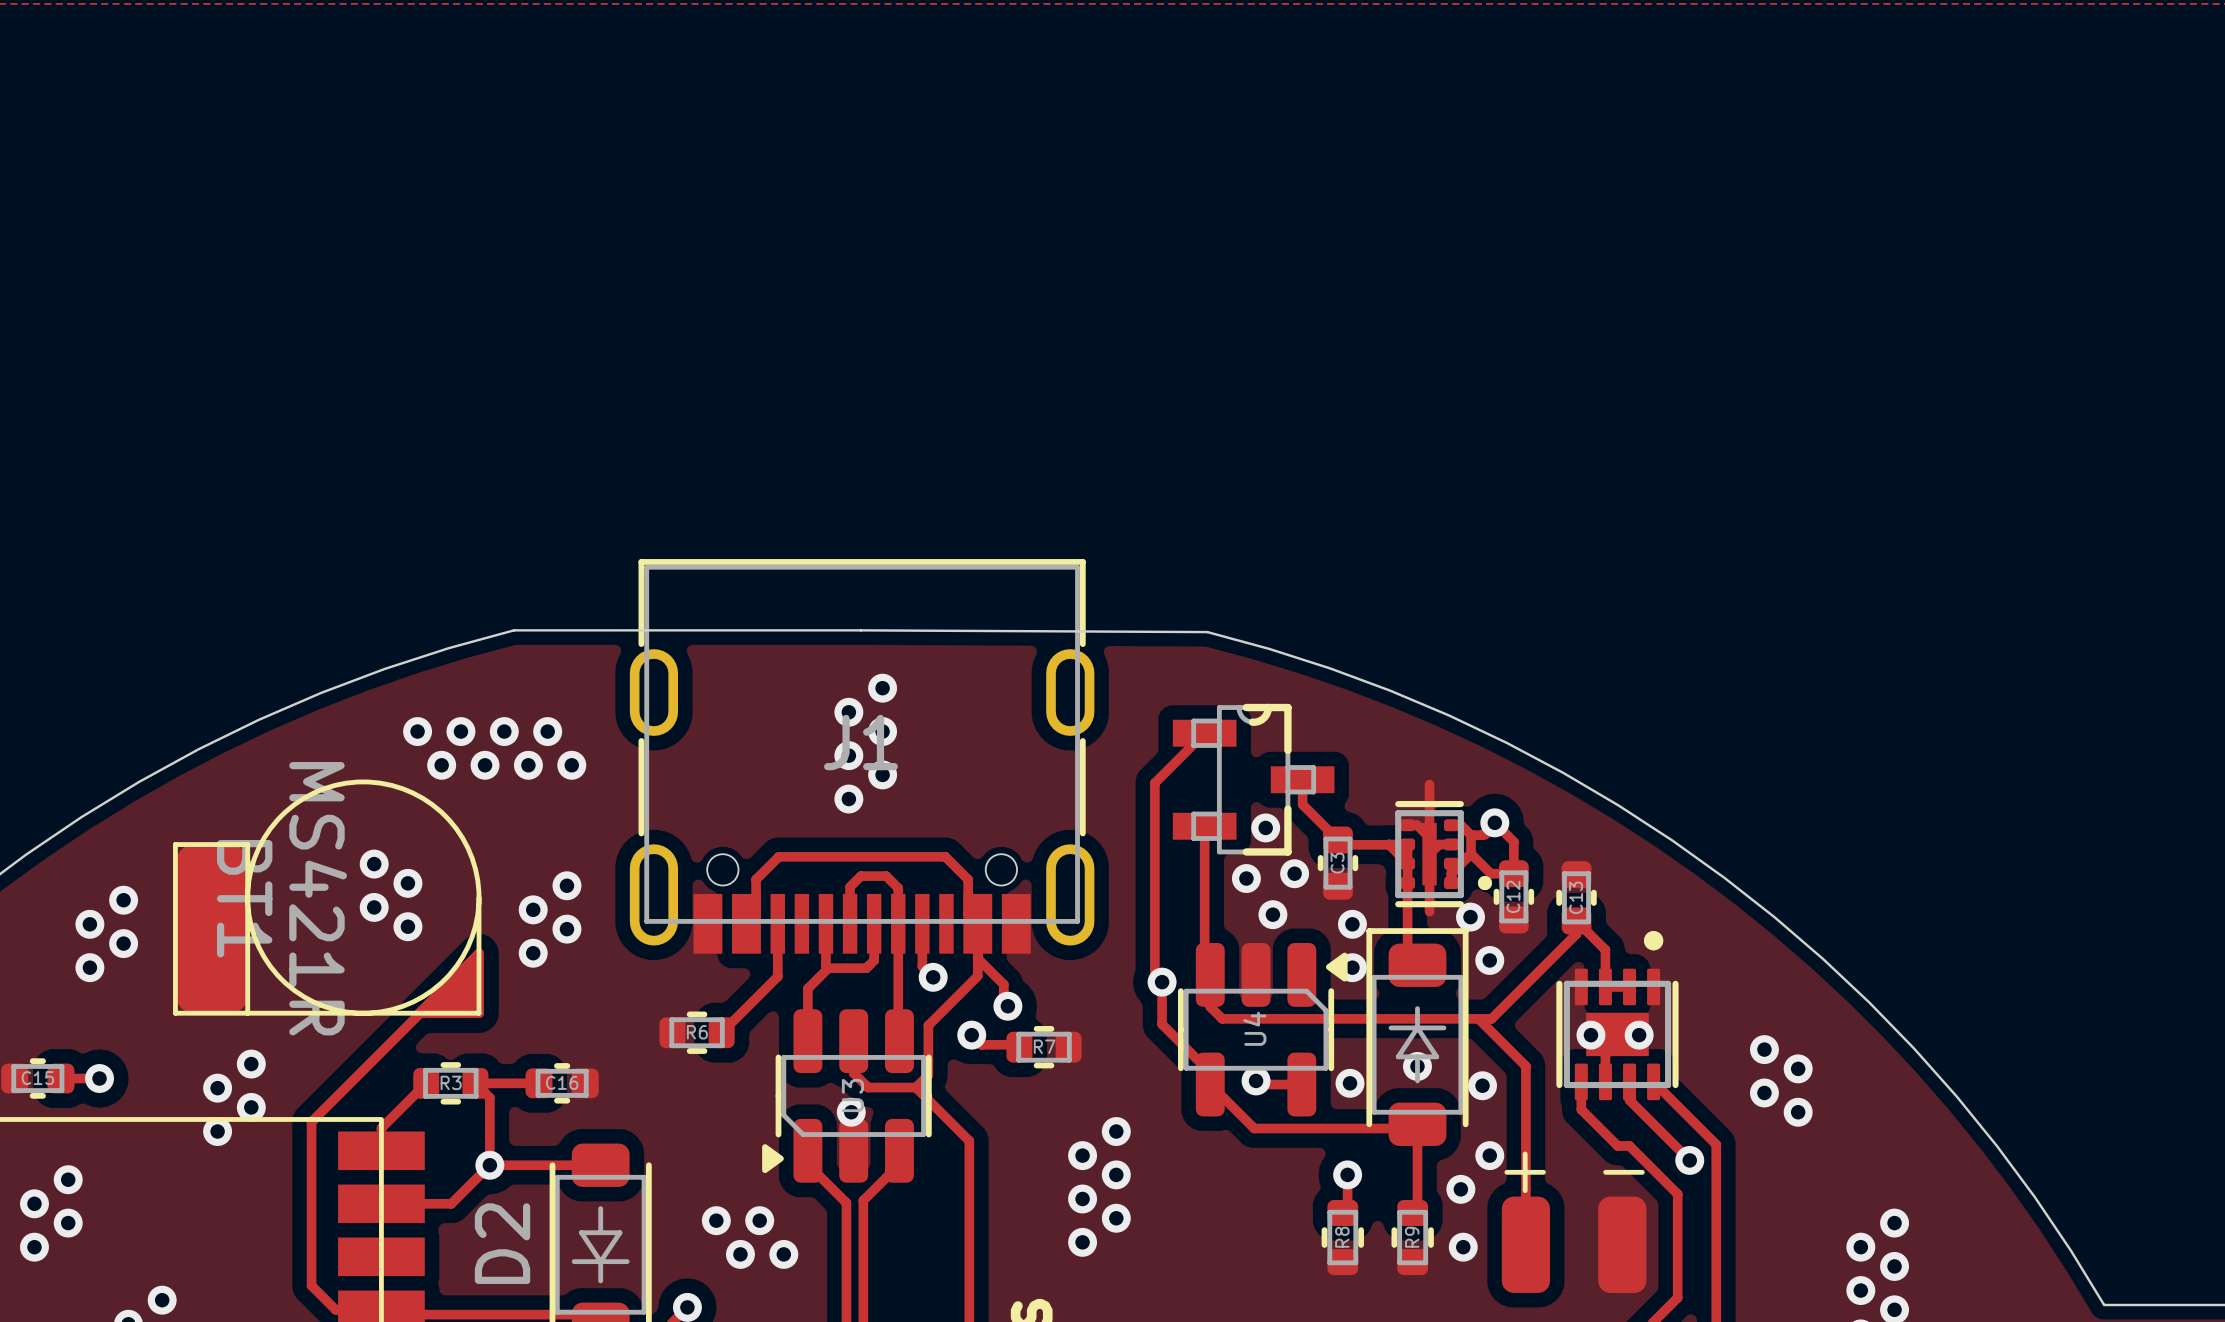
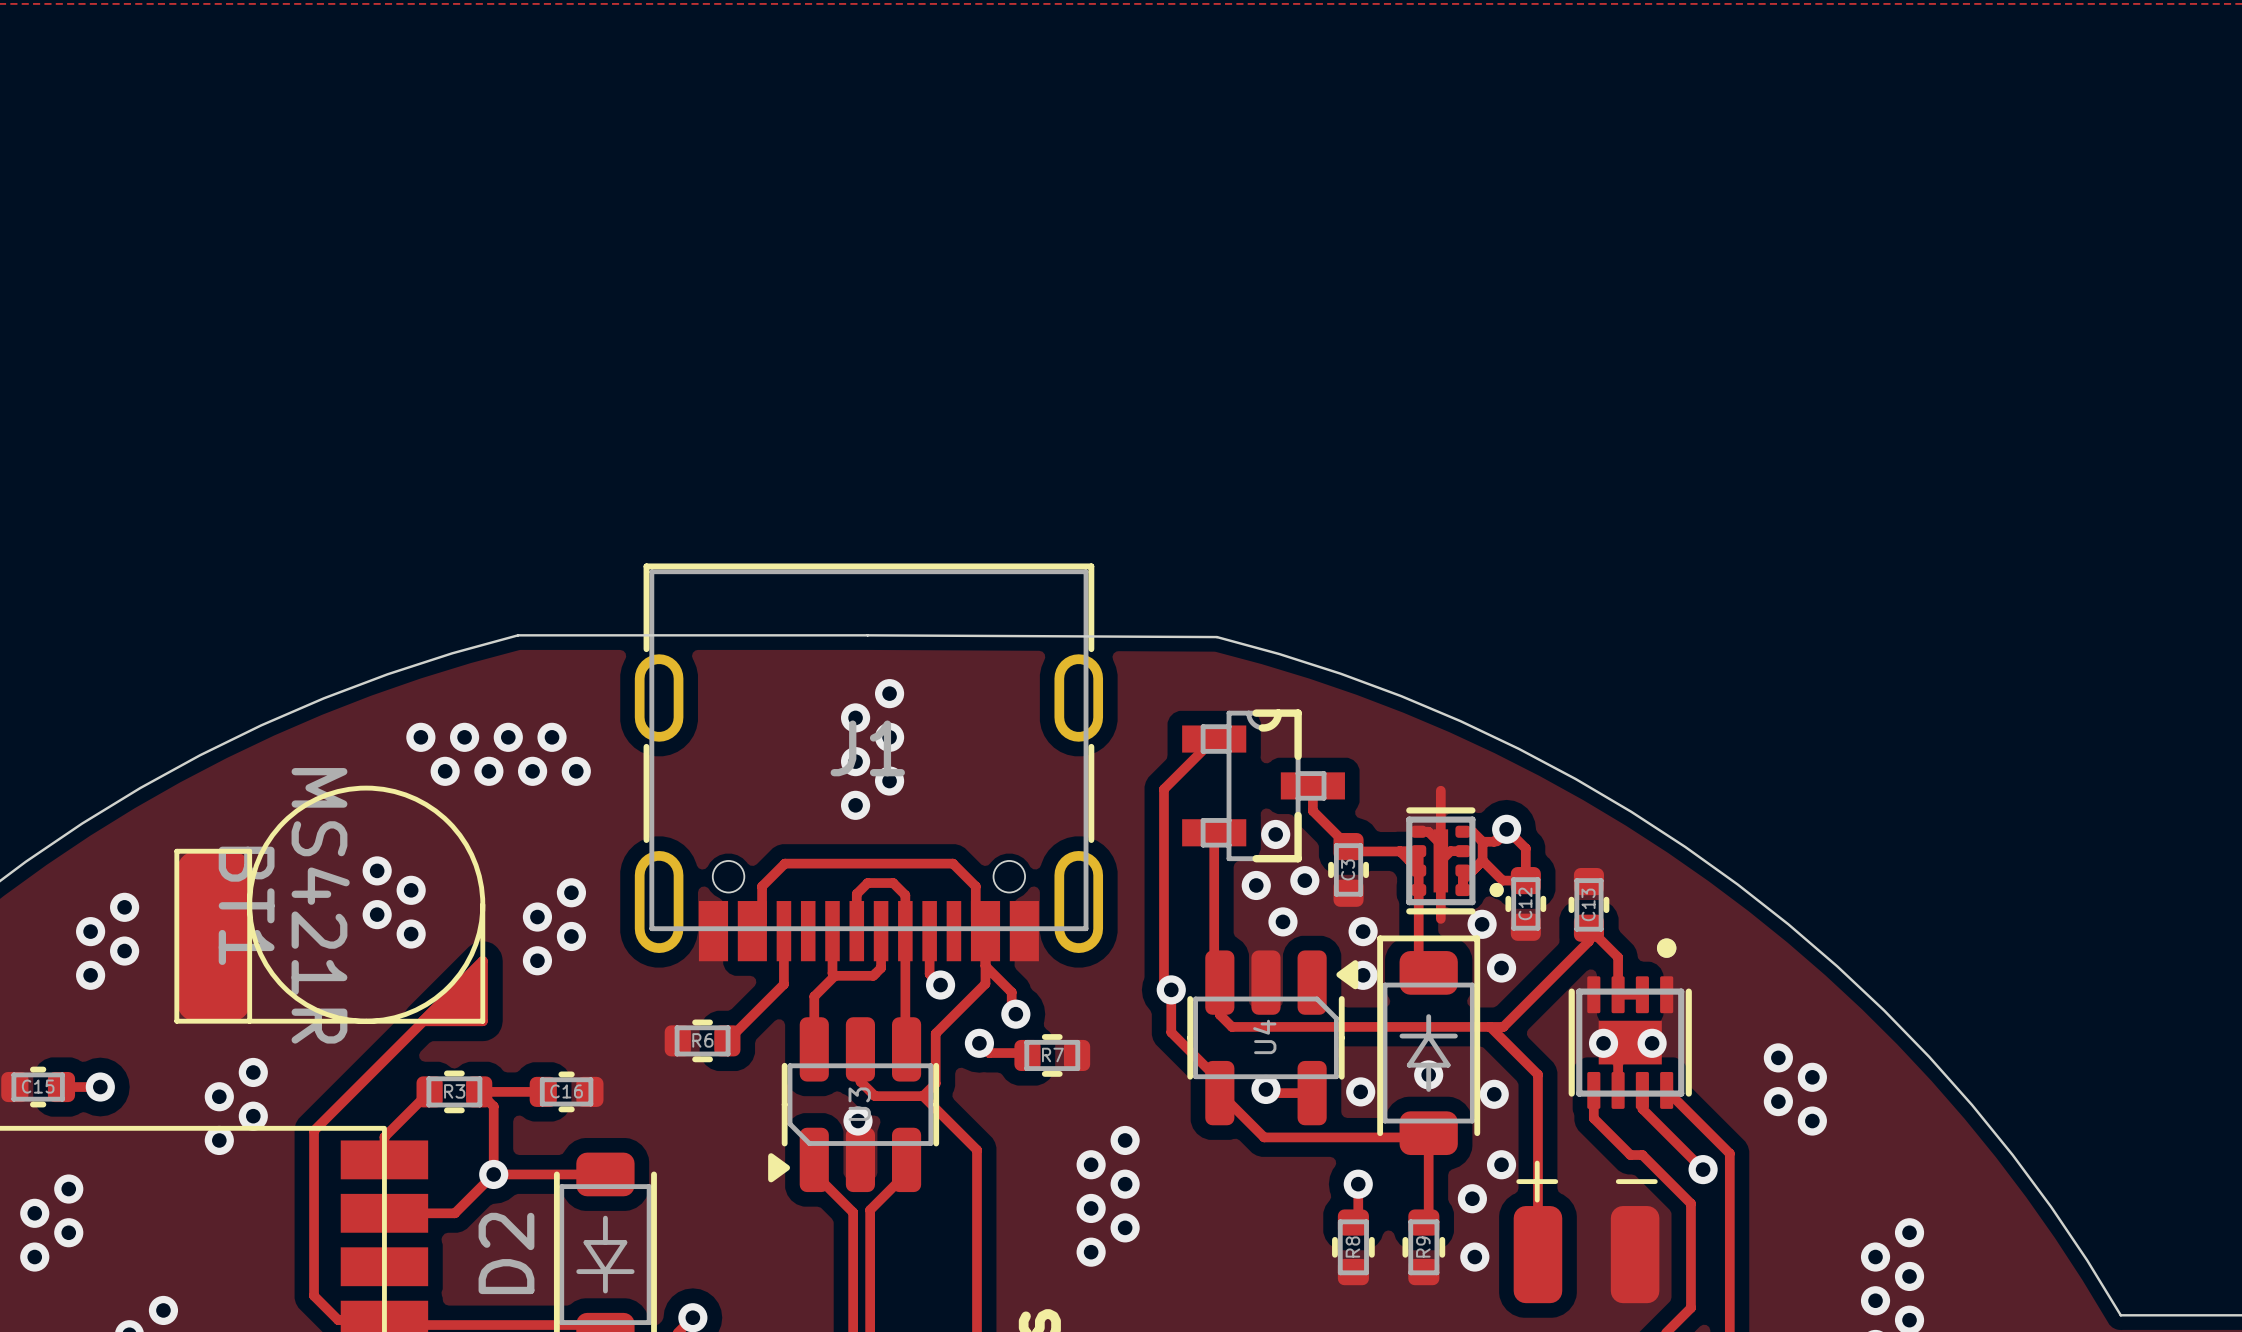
via: (716, 1220) -> none
via: (759, 1220) -> none
via: (740, 1254) -> none
via: (783, 1254) -> none

